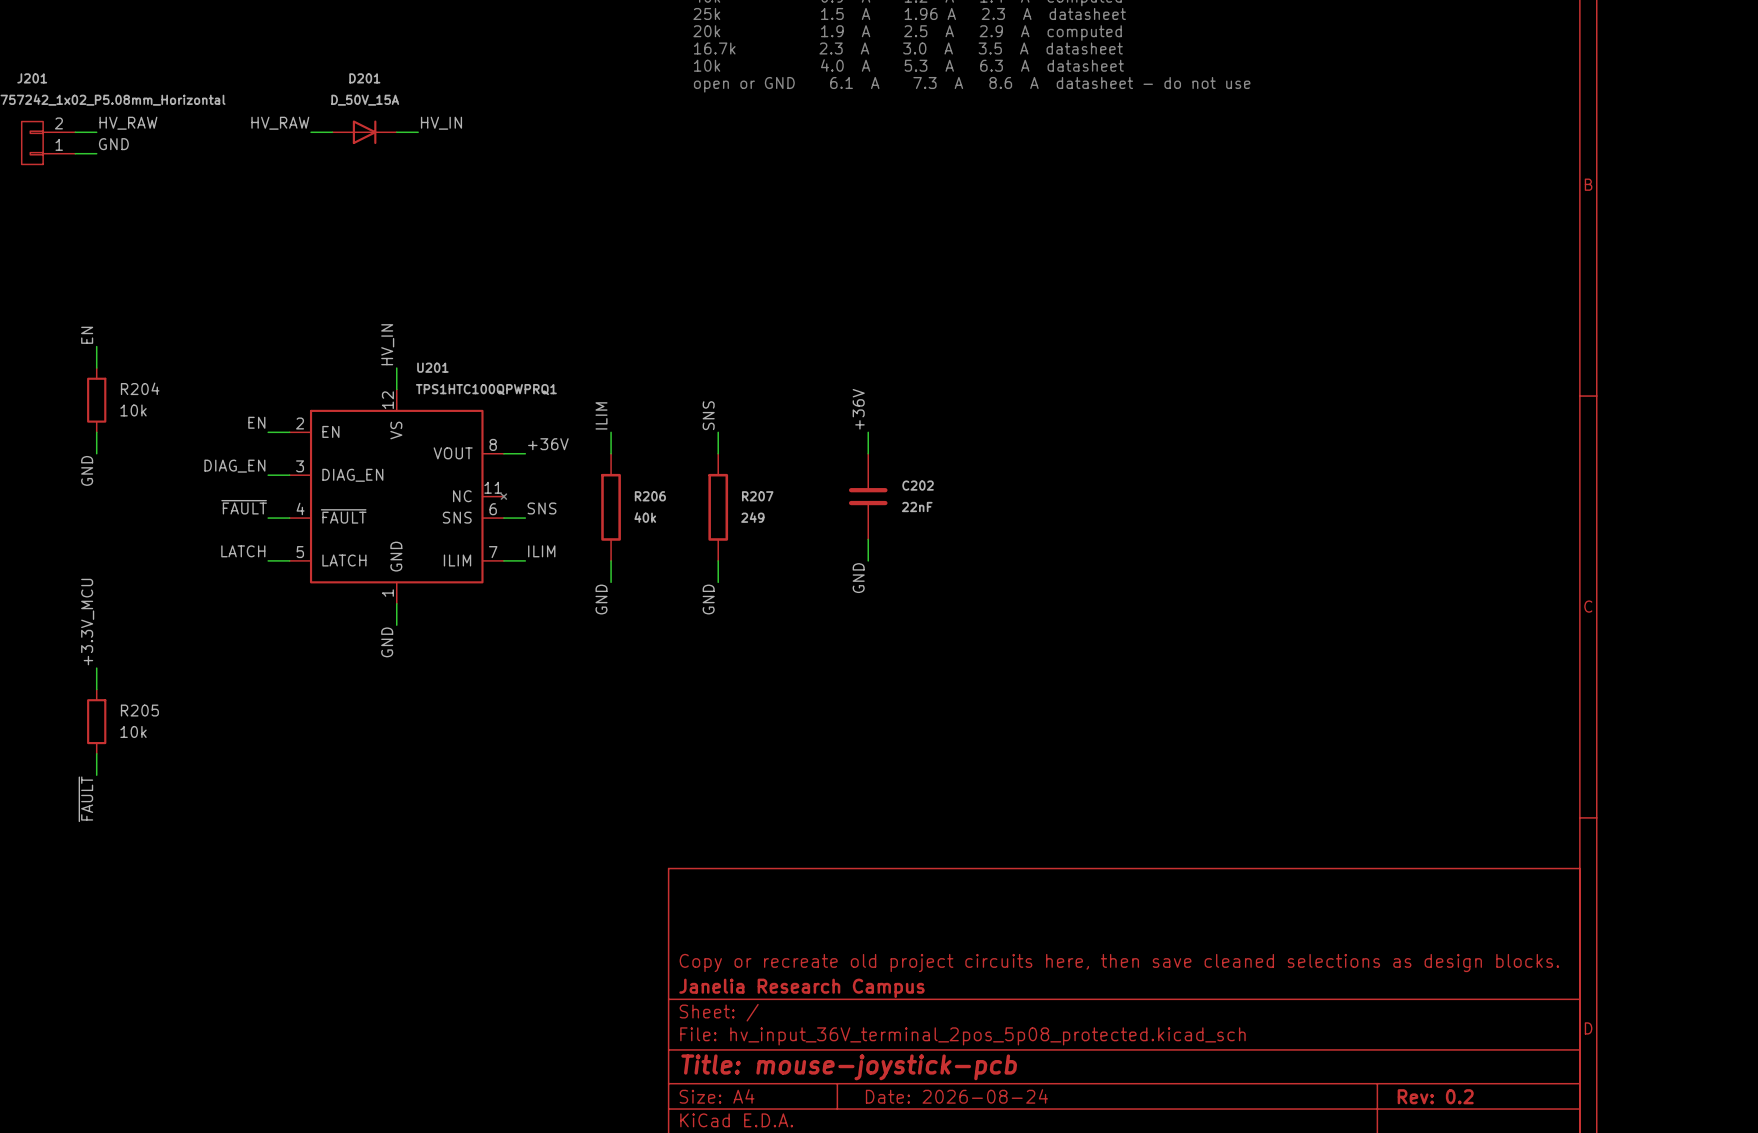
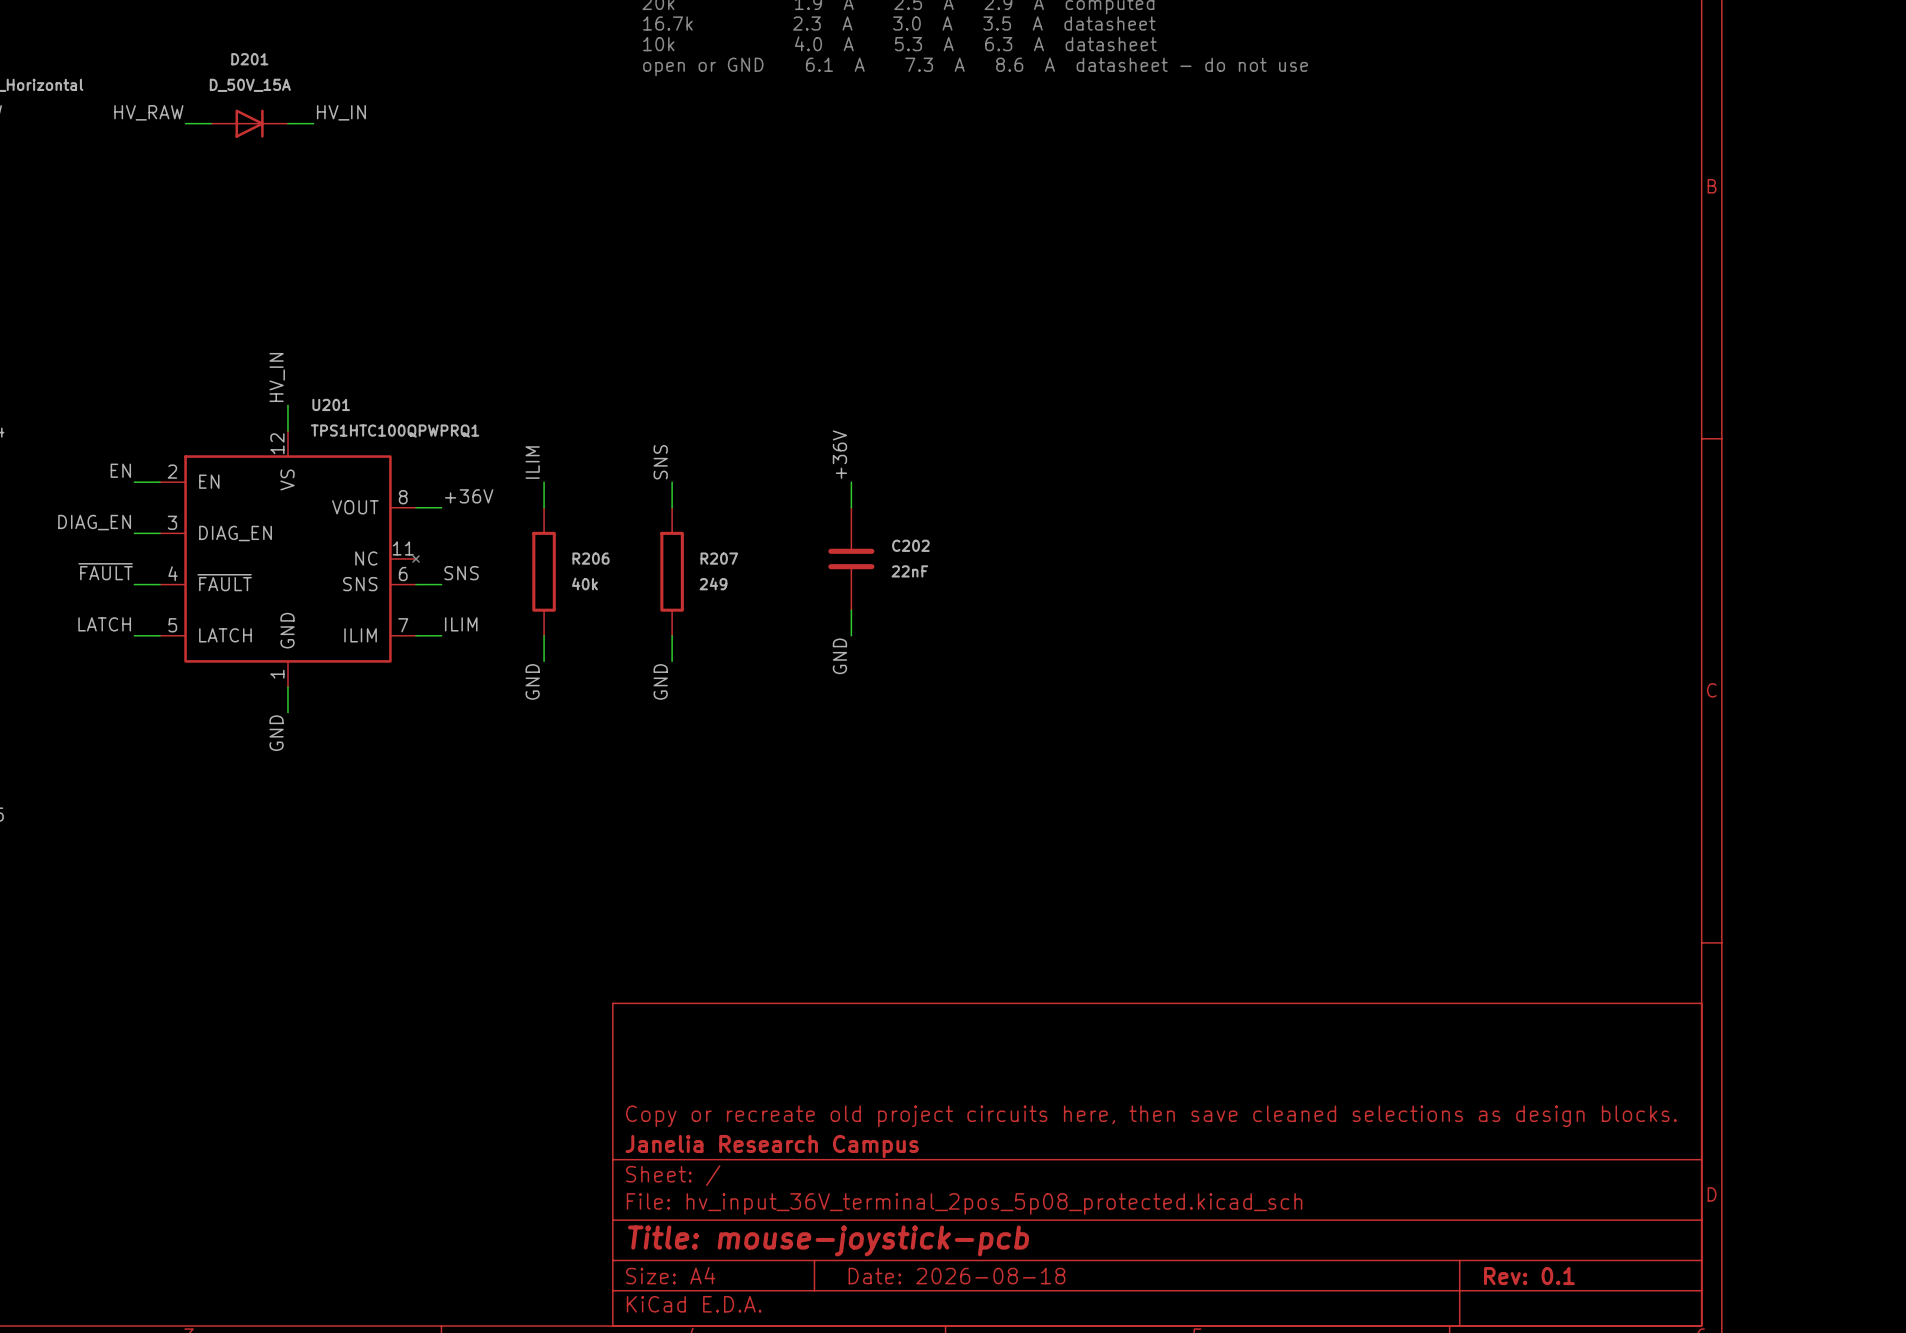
title block: Date: 2026-08-24 (956, 1096) -> Date: 2026-08-18 (956, 1276)
title block: Rev: 0.2 (1435, 1096) -> Rev: 0.1 (1529, 1276)

